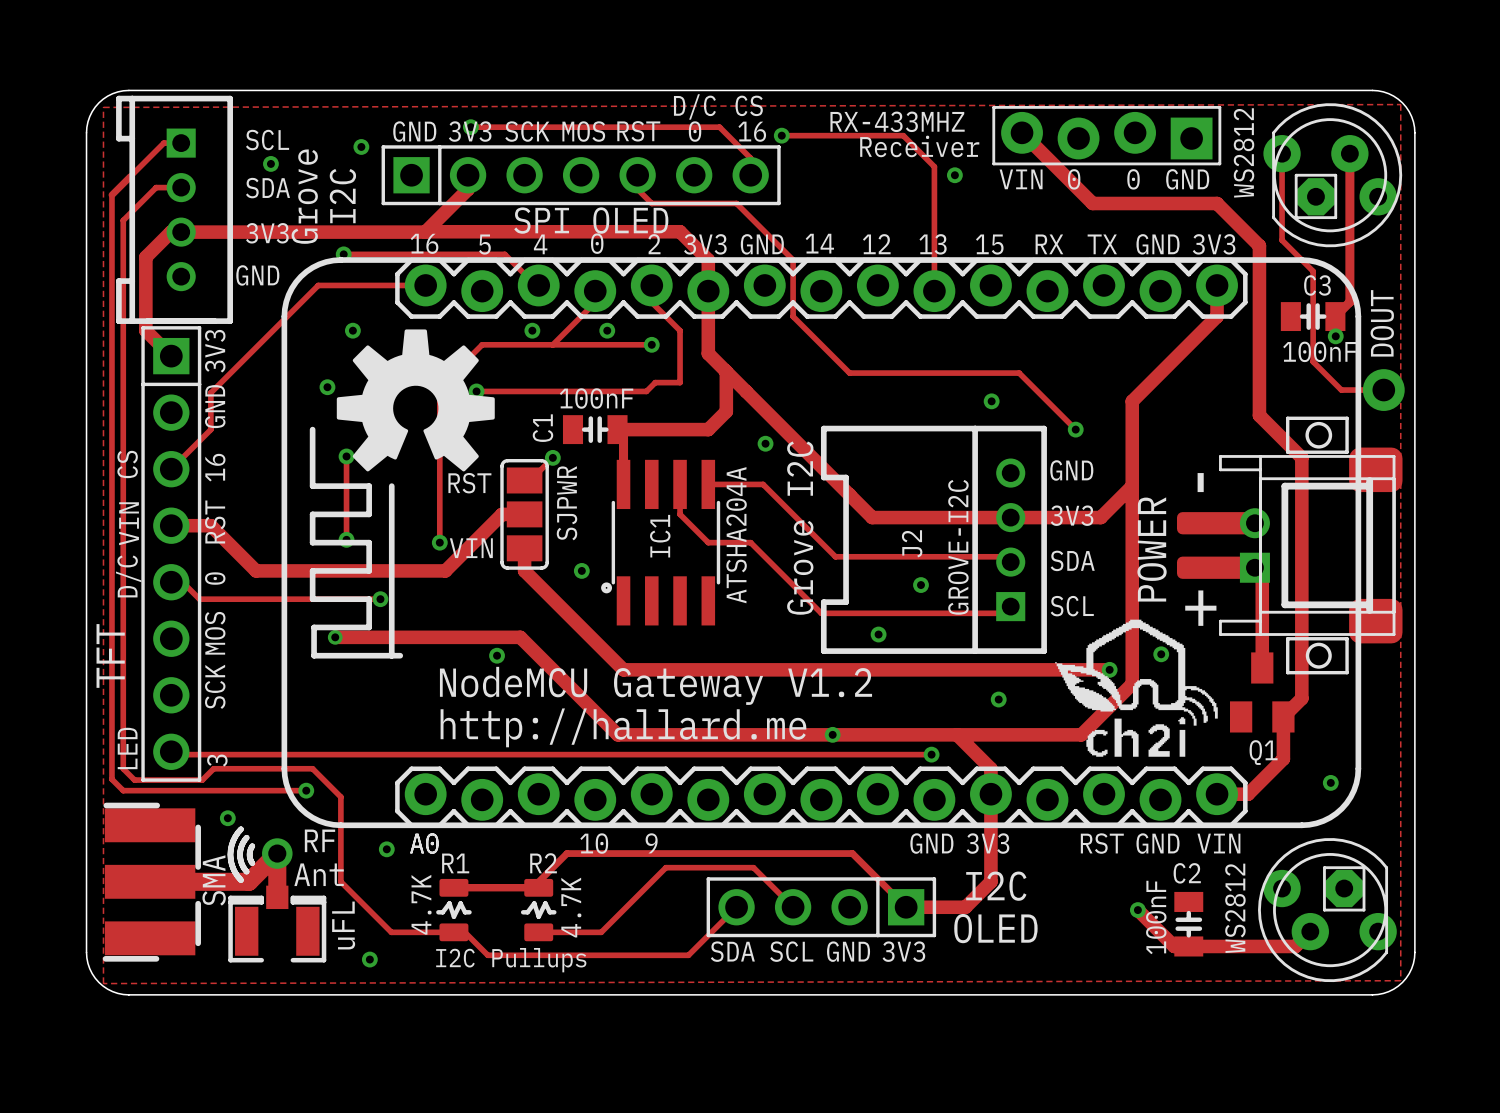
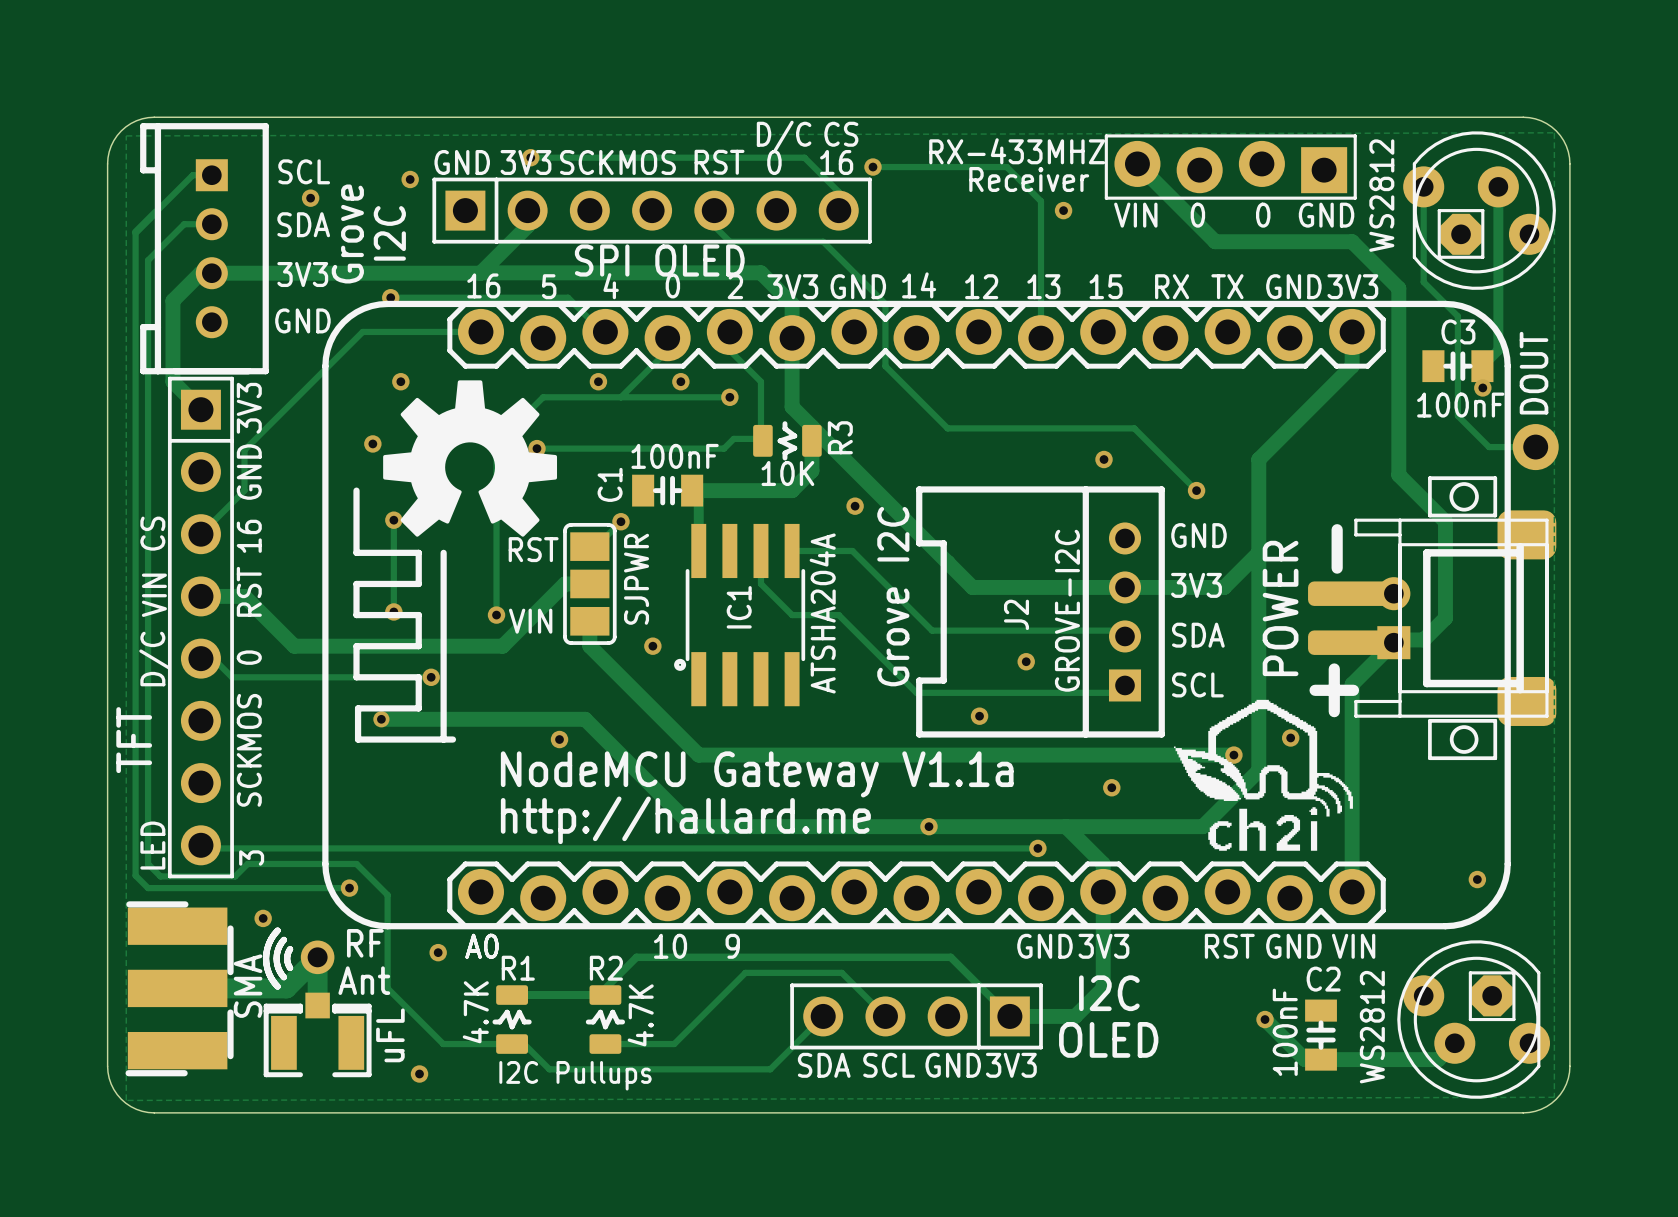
R3: none -> 10K (787, 440)
track: (1301, 545) (1301, 698) (1283, 716) (1283, 758) (1248, 794) (1217, 794) -> (1445, 618) (1423, 639) (1396, 639) (1352, 684) (1352, 891)
track: (1254, 567) (1262, 575) (1262, 667) -> none
text: NodeMCU Gateway V1.2 (655, 685) -> NodeMCU Gateway V1.1a (757, 774)
Q1: (1262, 692) -> none

